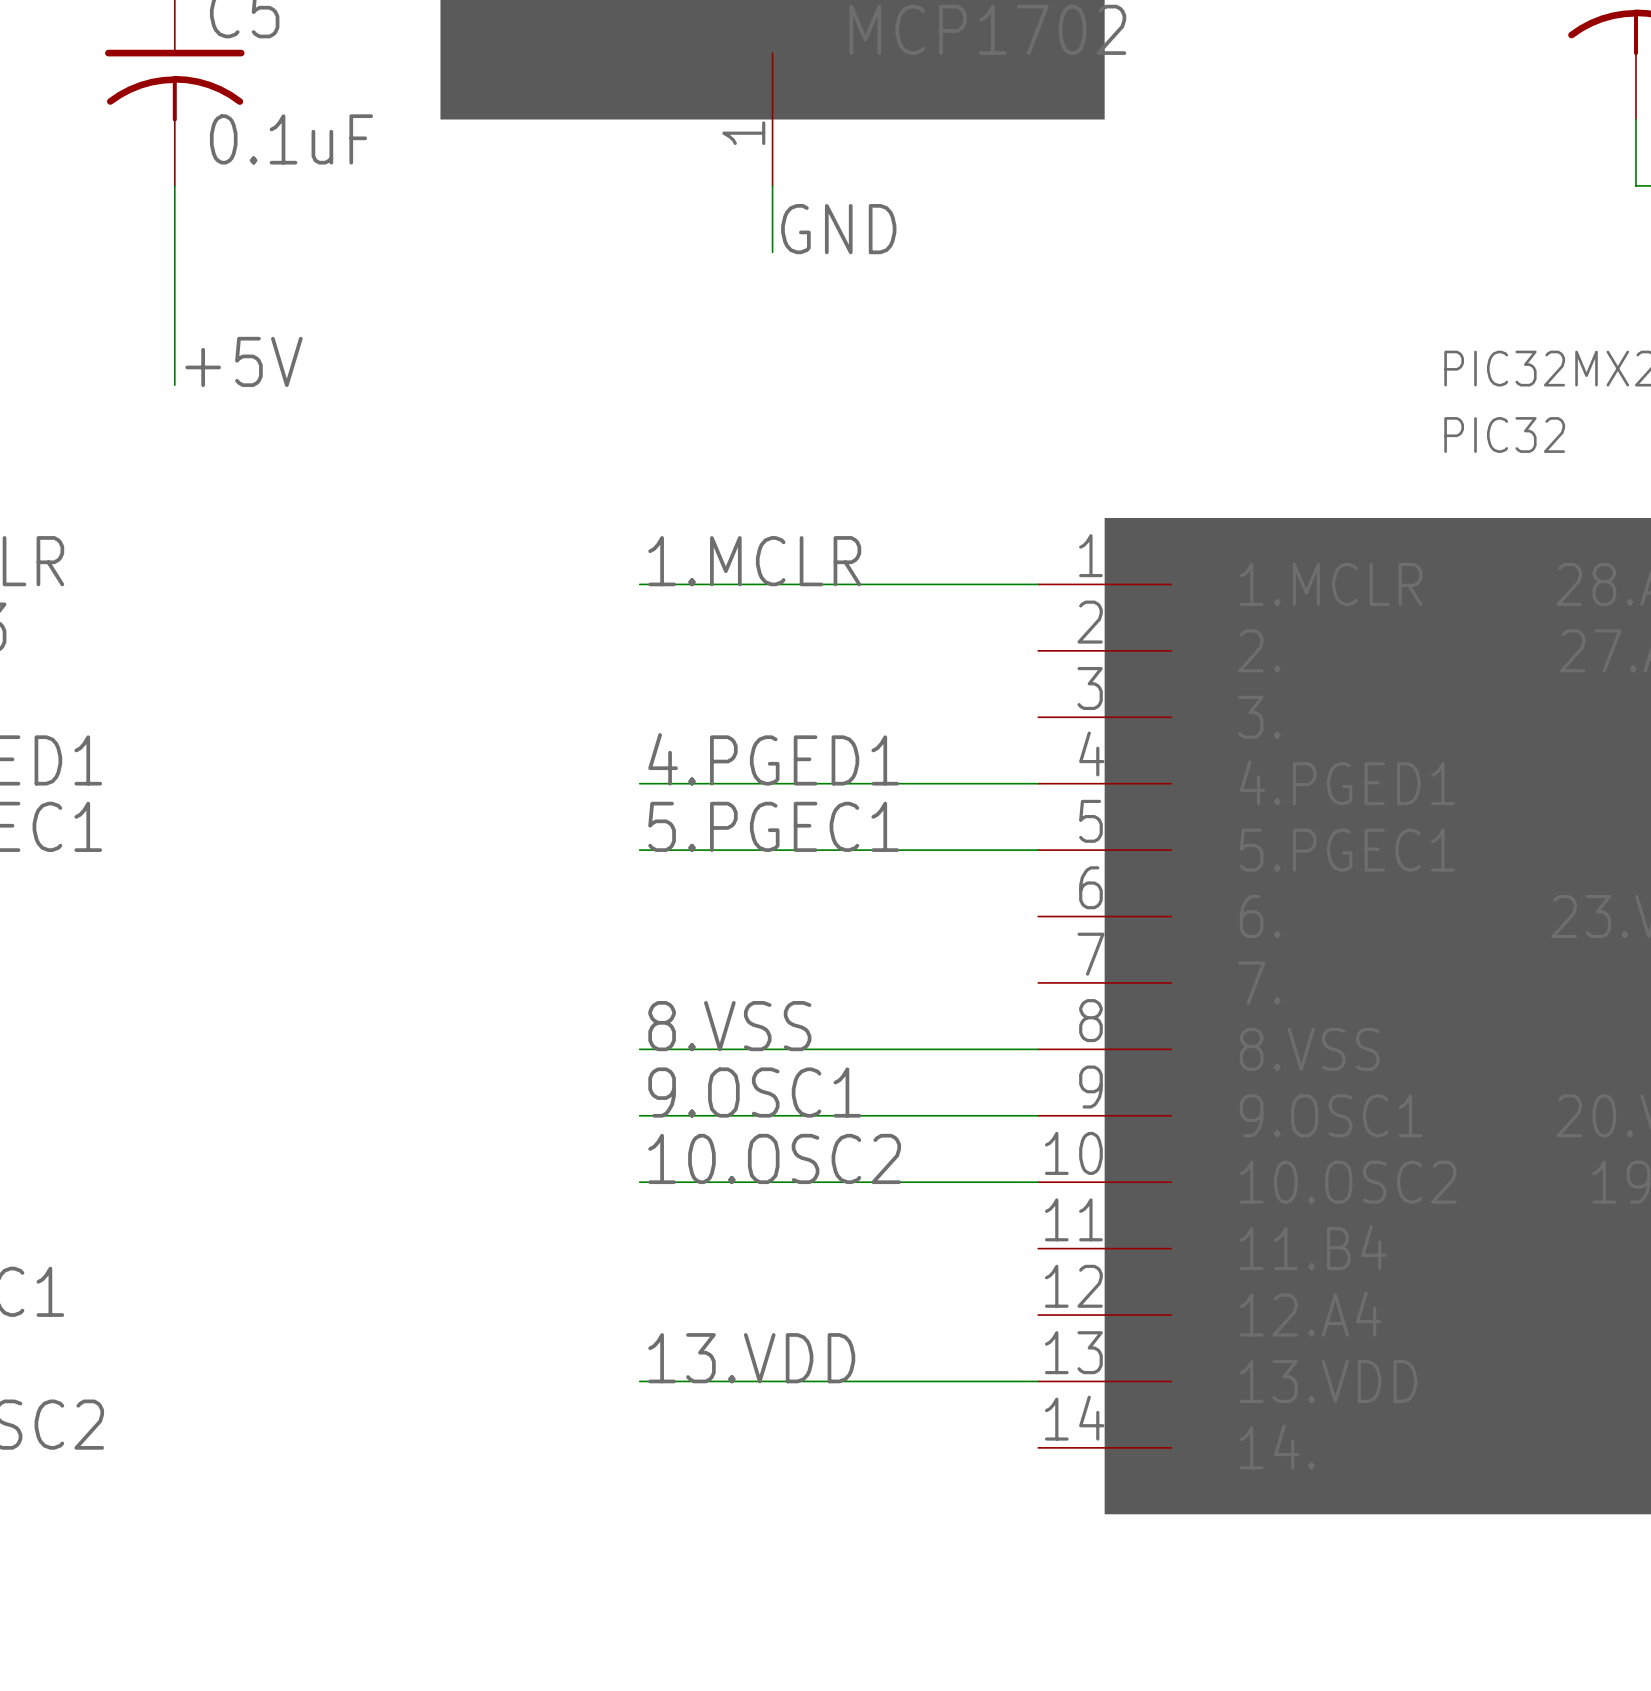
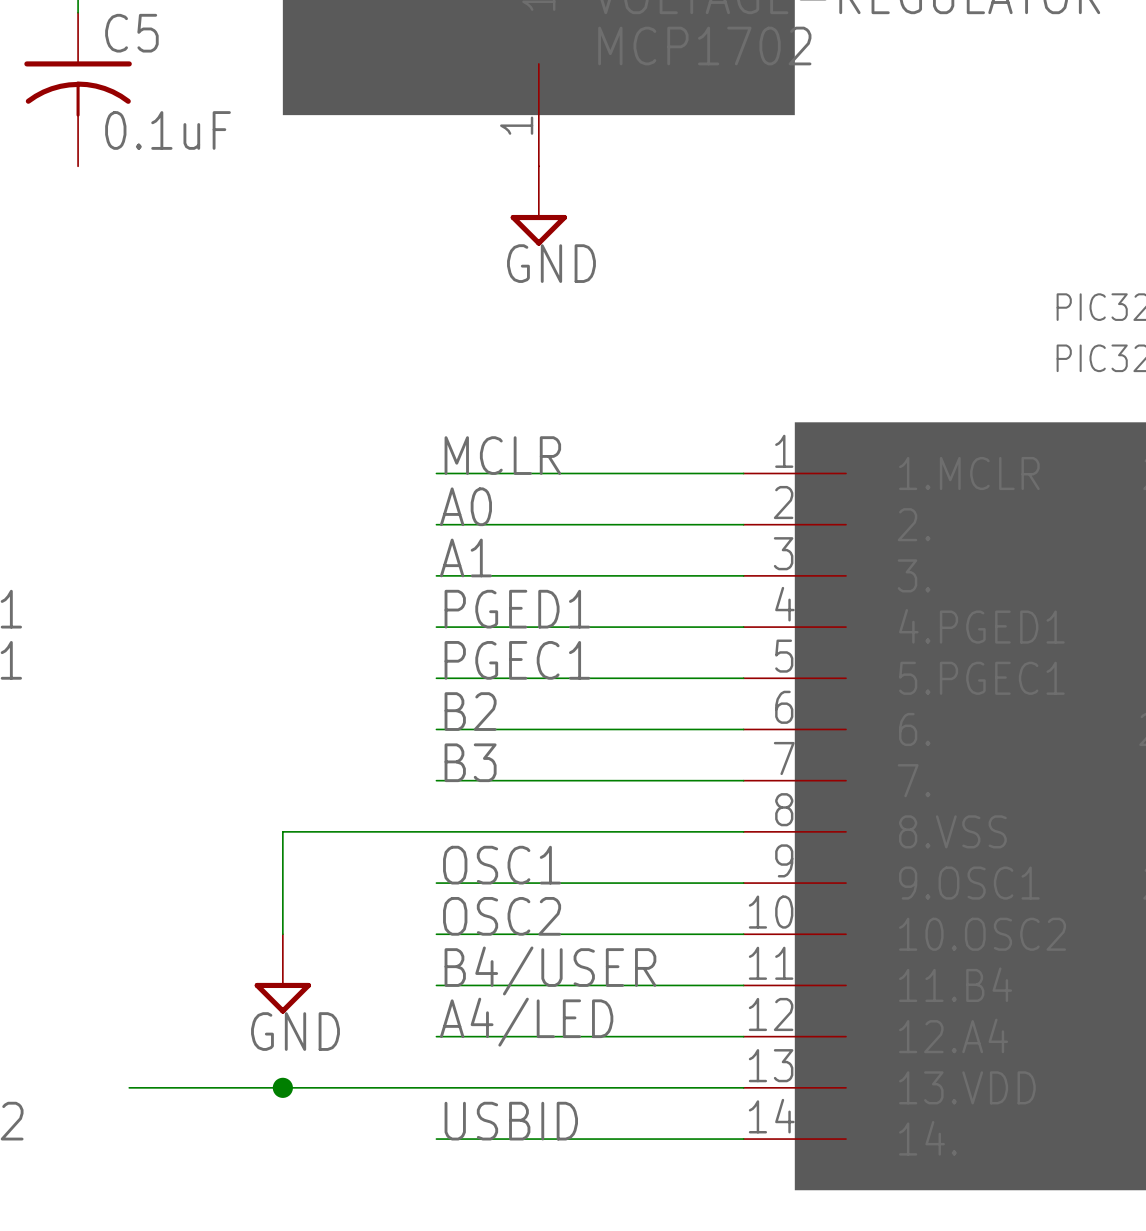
wire: (174, 185) (174, 385) -> none
label: GND (838, 229) -> none
power symbol: none -> GND (538, 205)
label: +5V (243, 361) -> none
label: 1.MCLR (754, 561) -> MCLR (502, 455)
label: none -> A0 (465, 506)
wire: none -> (436, 524) (743, 524)
label: none -> A1 (465, 557)
wire: none -> (436, 575) (743, 575)
label: 4.PGED1 (773, 759) -> PGED1 (517, 609)
label: 5.PGEC1 (773, 826) -> PGEC1 (517, 660)
label: none -> B2 (470, 711)
wire: none -> (436, 729) (743, 729)
label: none -> B3 (470, 762)
wire: none -> (436, 780) (743, 780)
label: 8.VSS (729, 1026) -> none
wire: none -> (436, 831) (282, 831) (282, 934)
label: 9.OSC1 (754, 1092) -> OSC1 (502, 865)
label: 10.OSC2 (774, 1158) -> OSC2 (502, 916)
label: none -> B4/USER (550, 970)
power symbol: none -> GND (282, 973)
wire: none -> (436, 985) (743, 985)
label: none -> A4/LED (526, 1022)
wire: none -> (436, 1036) (743, 1036)
label: 13.VDD (751, 1358) -> none
wire: none -> (129, 1087) (436, 1087)
junction: none -> (282, 1087)
label: none -> USBID (511, 1121)
wire: none -> (436, 1139) (743, 1139)

